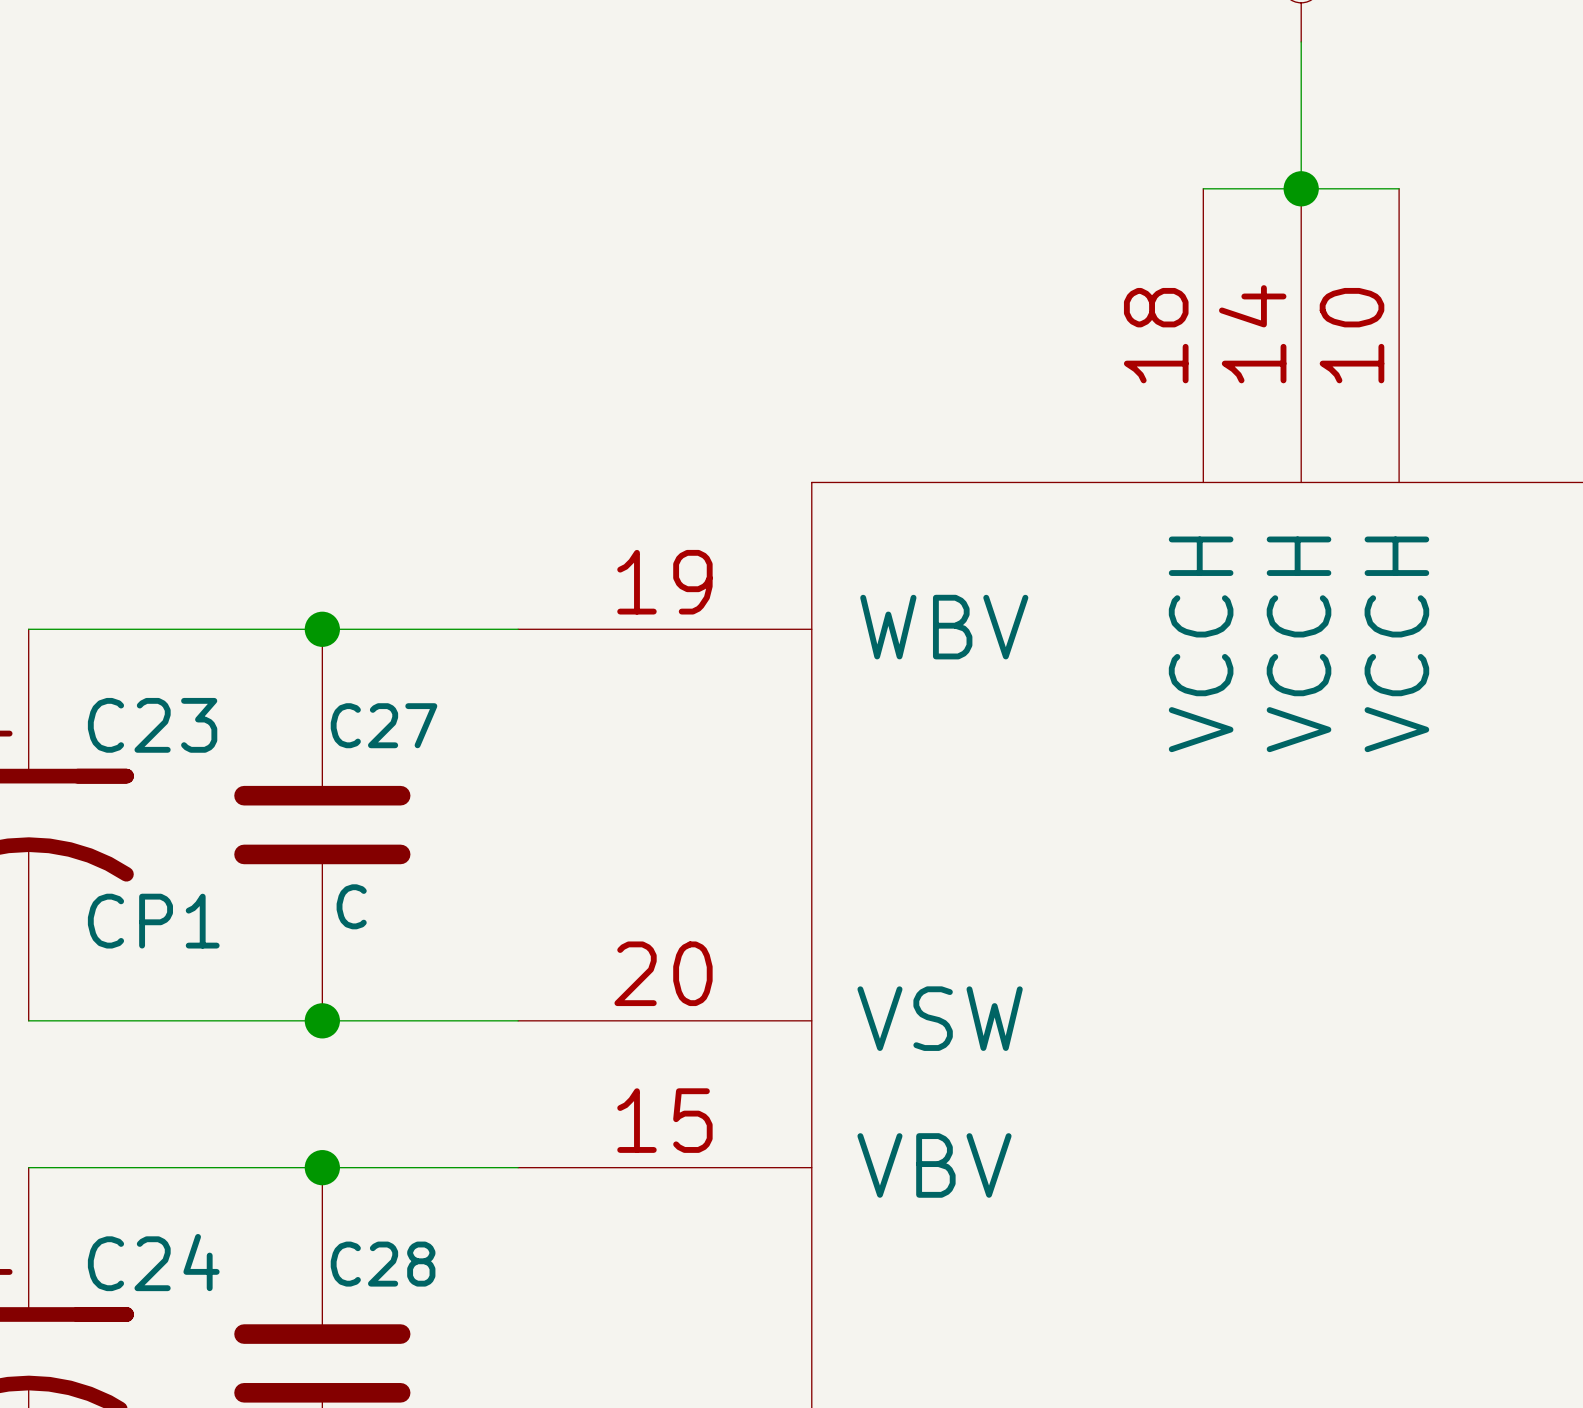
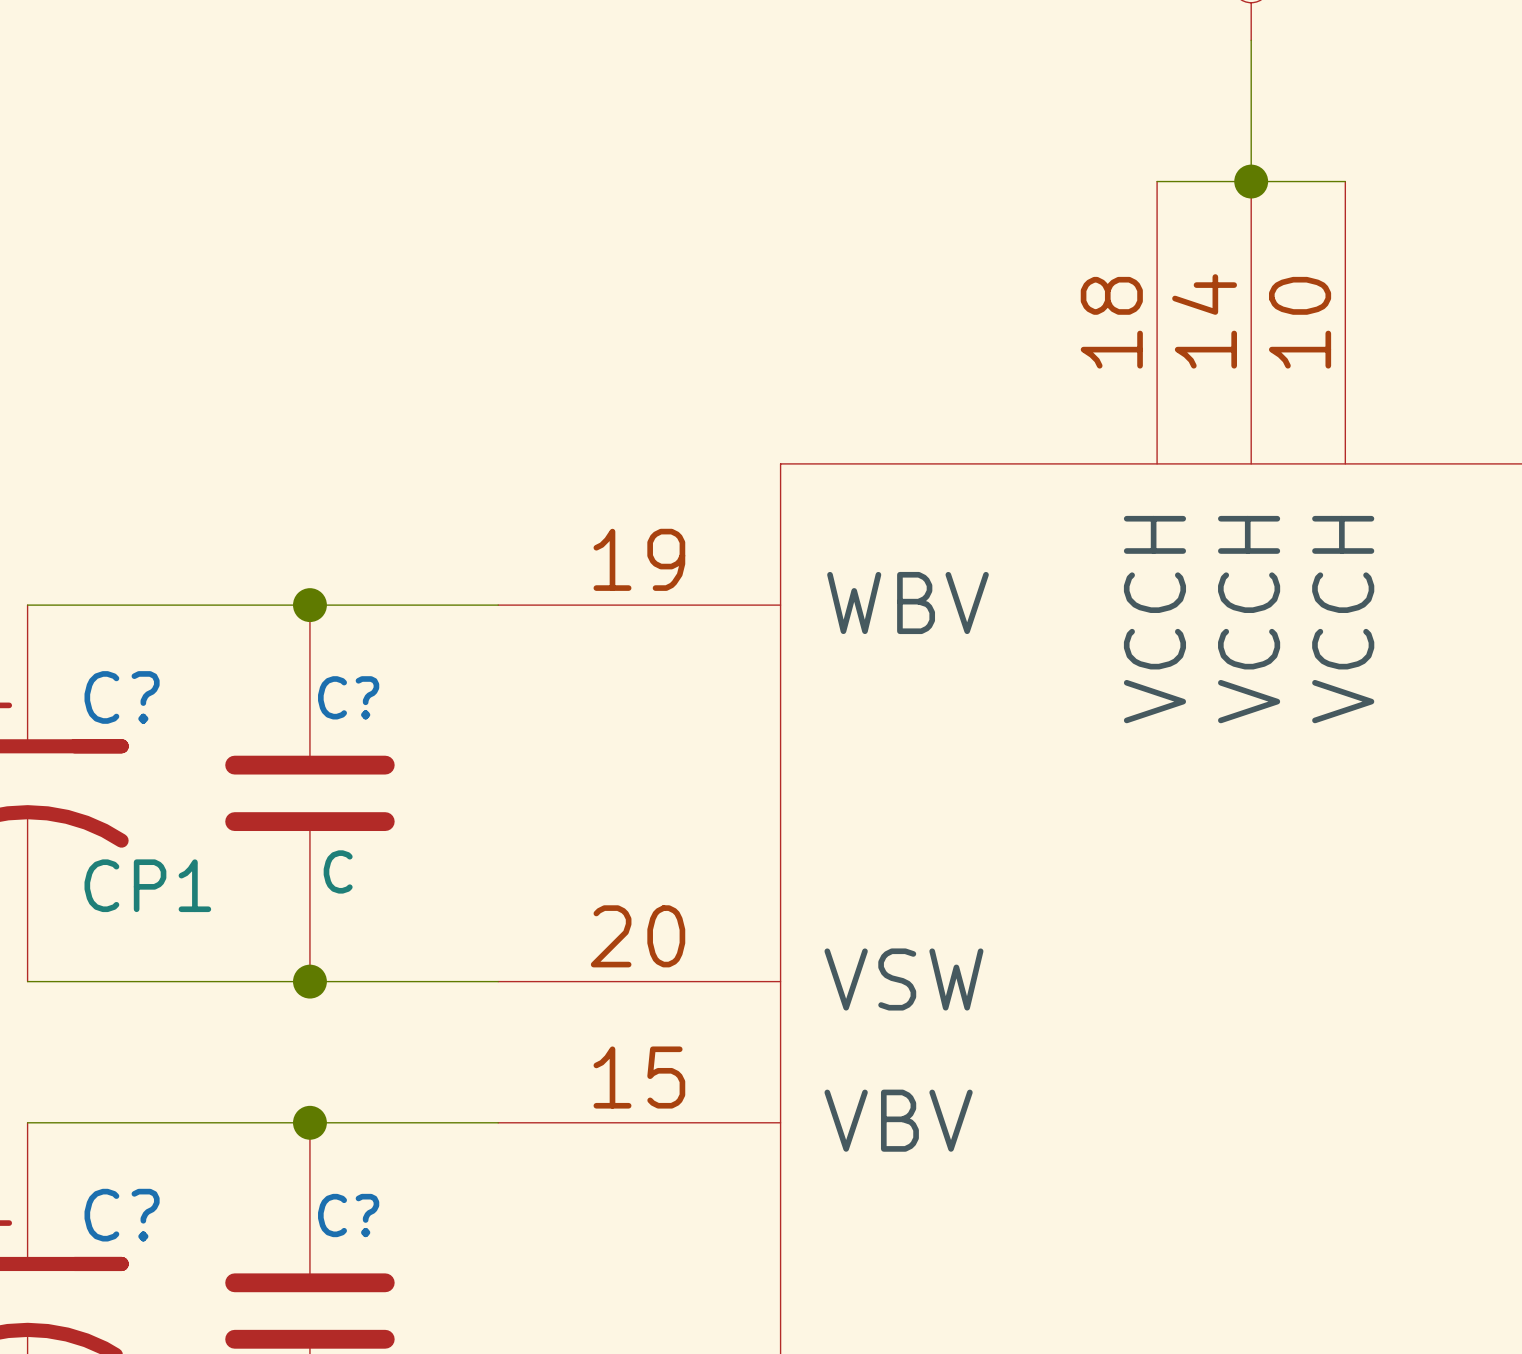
C23 name: C23 (152, 725) -> C? (122, 697)
C27 name: C27 (384, 725) -> C? (348, 697)
C24 name: C24 (153, 1262) -> C? (122, 1215)
C28 name: C28 (383, 1264) -> C? (348, 1215)

